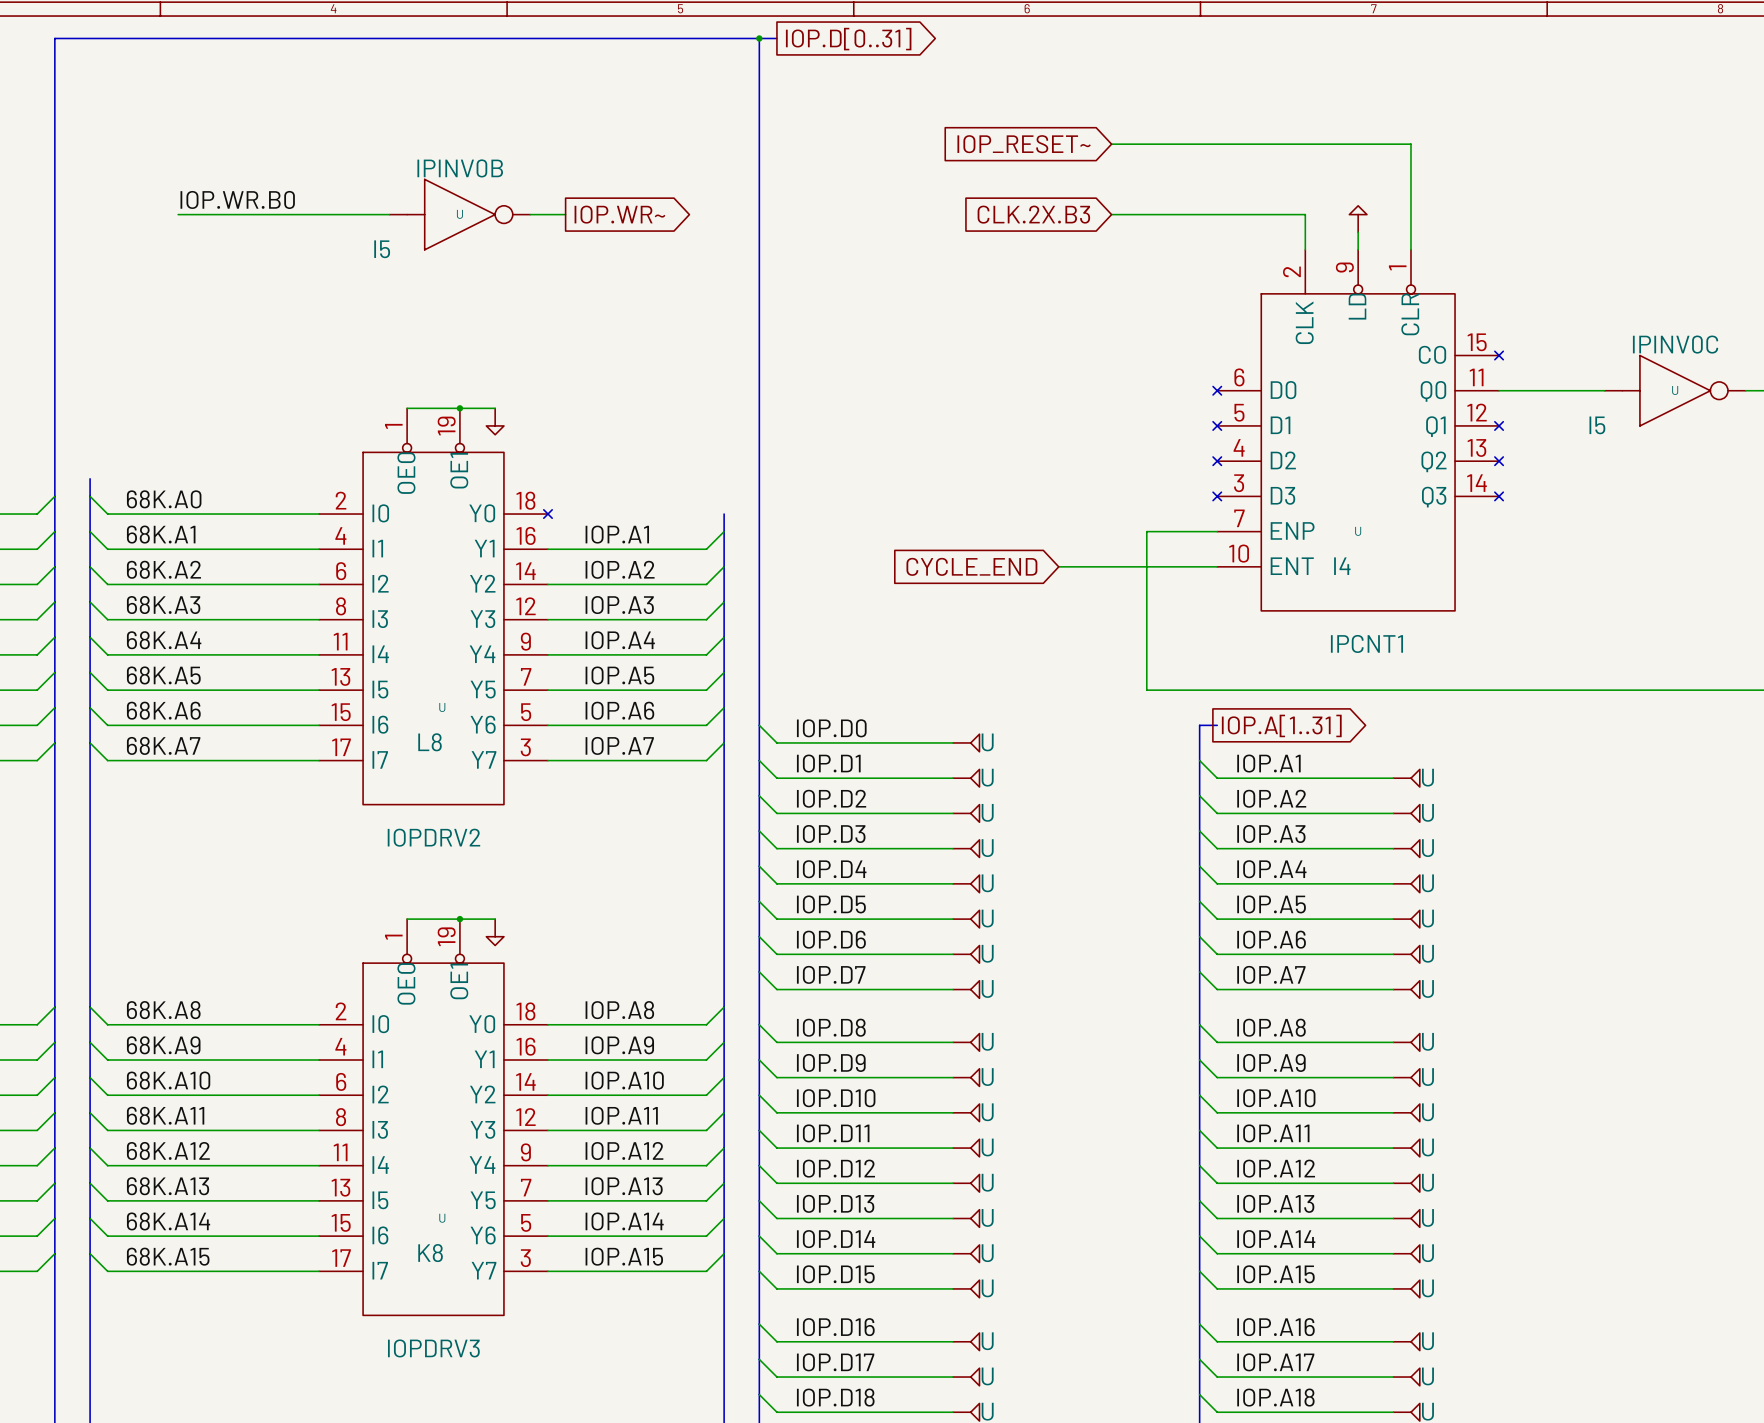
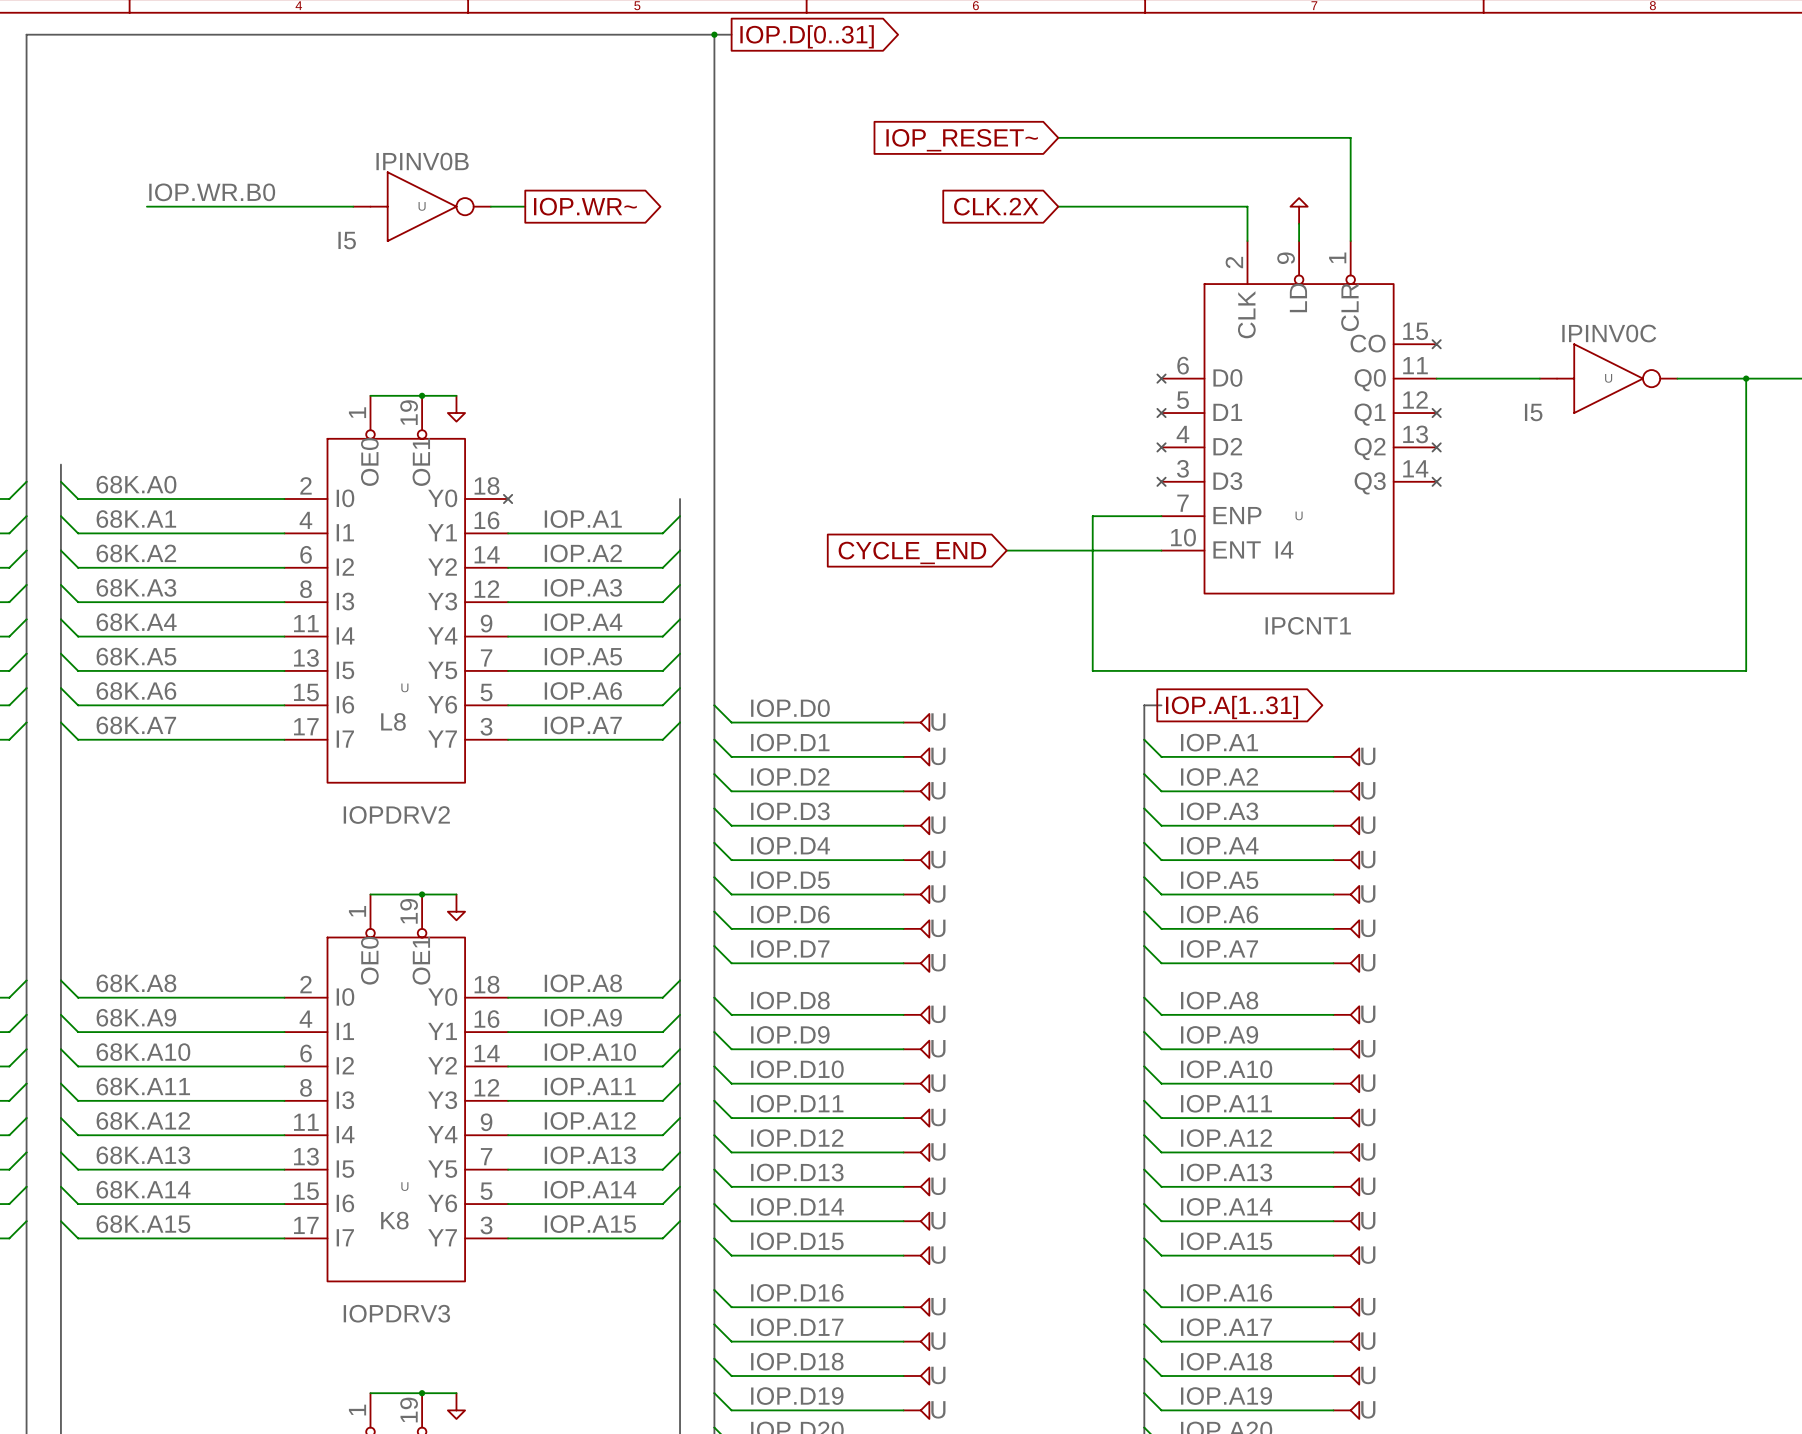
global label: CLK.2X.B3 (1033, 214) -> CLK.2X (996, 206)

